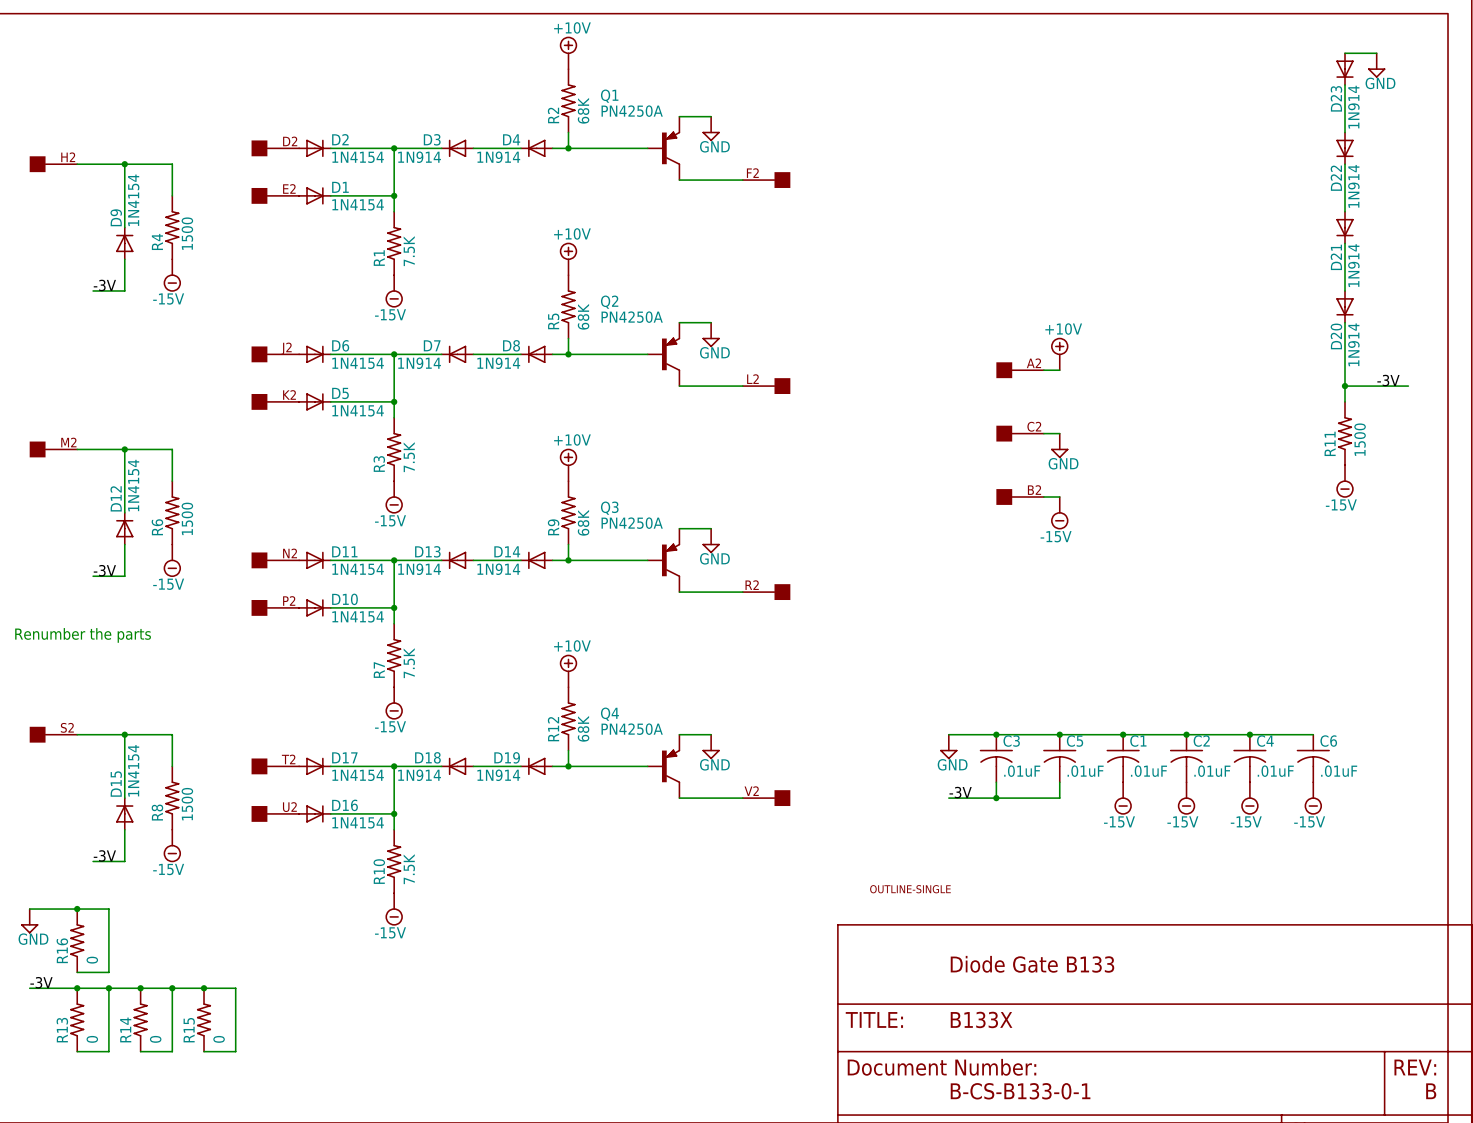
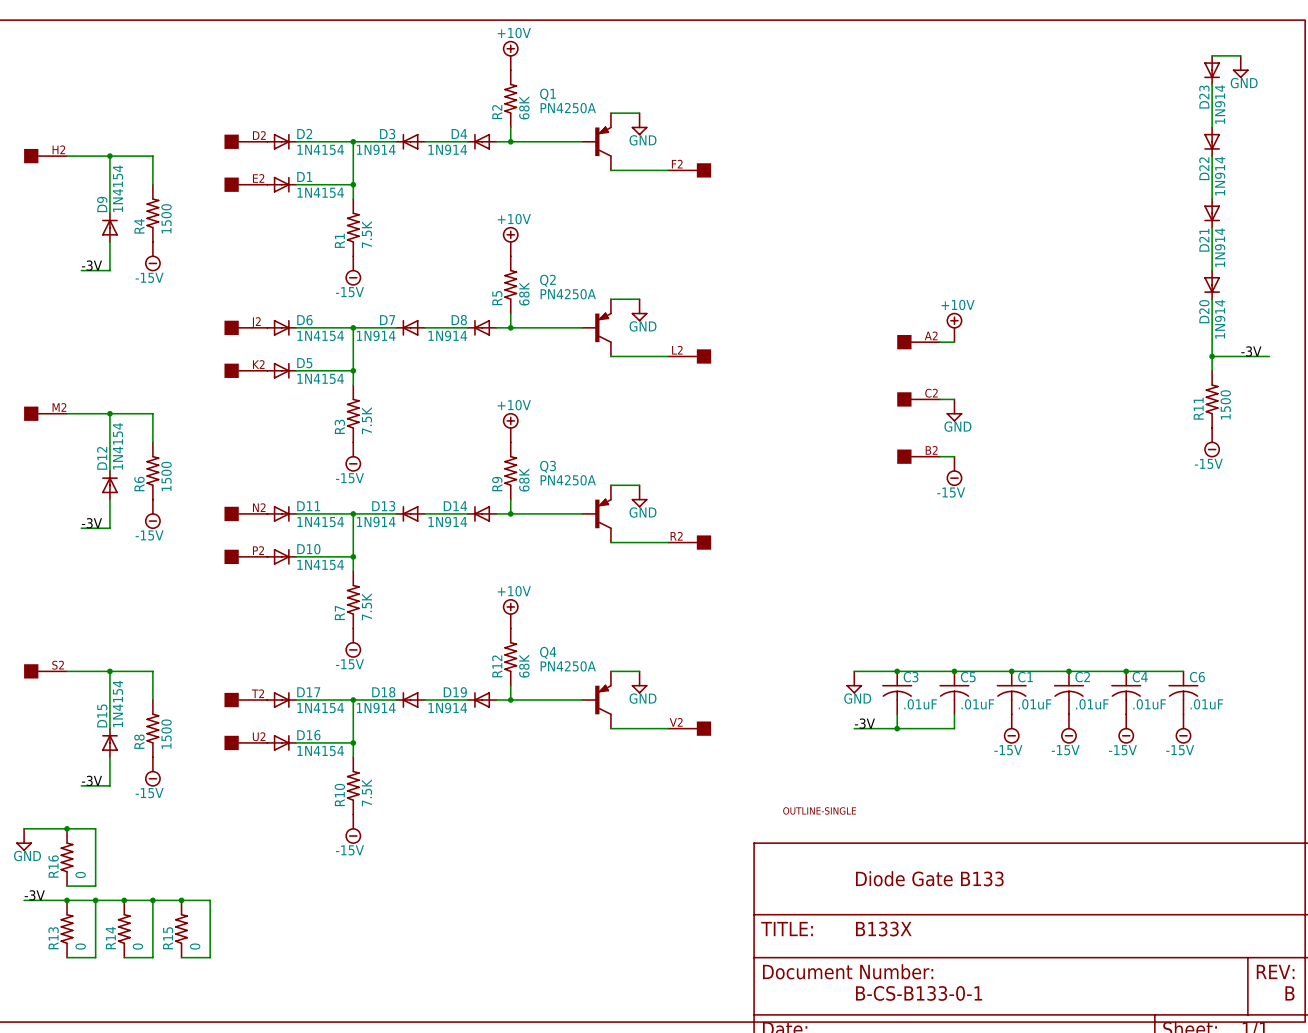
text: Renumber the parts (83, 635) -> none

